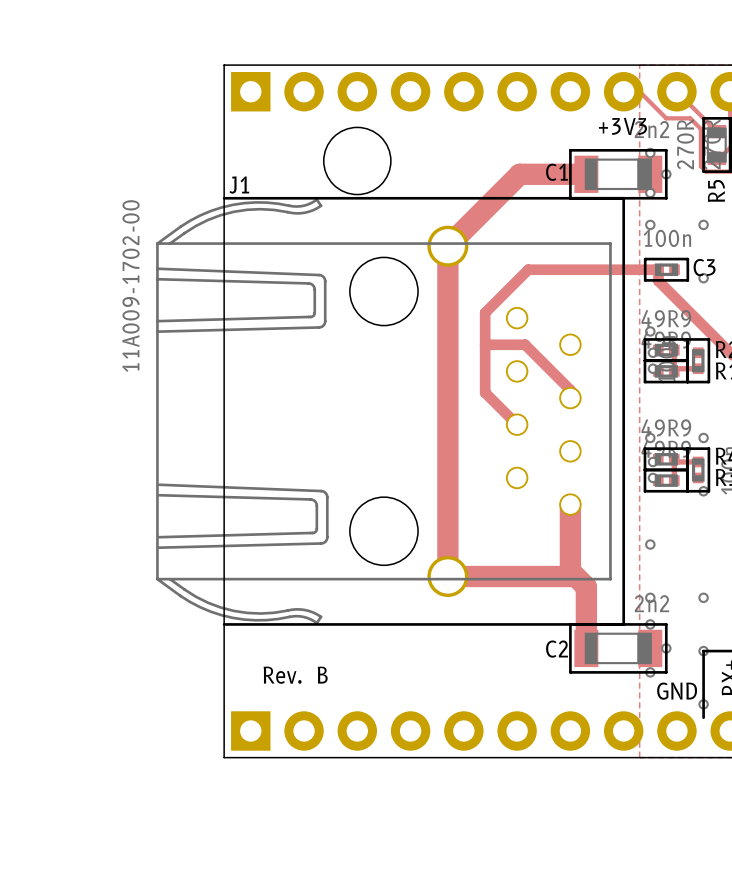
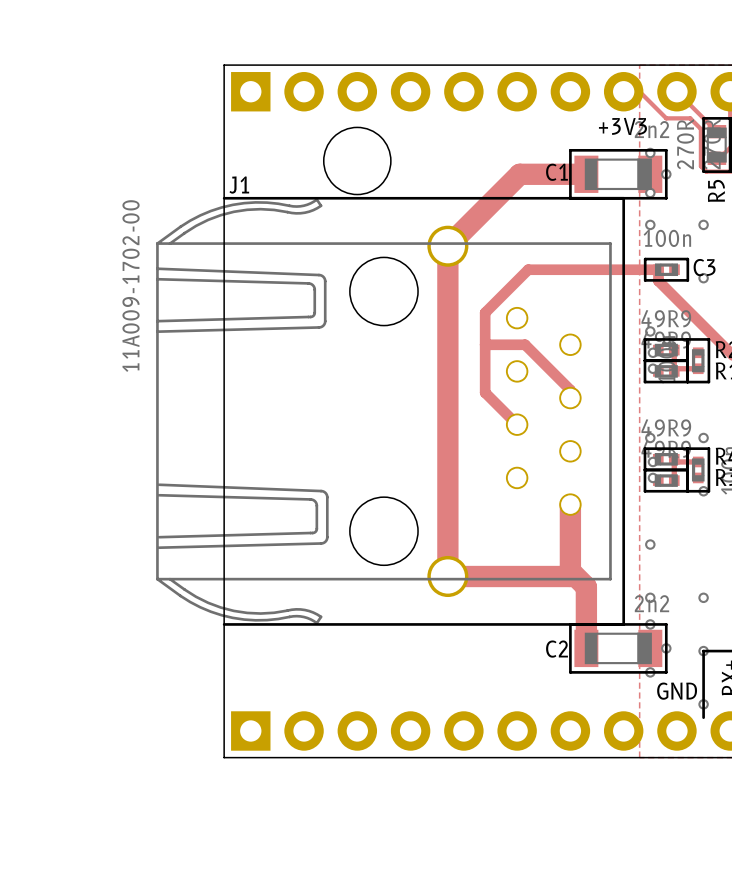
text: Rev. (282, 675) -> none
text: B (322, 675) -> none

